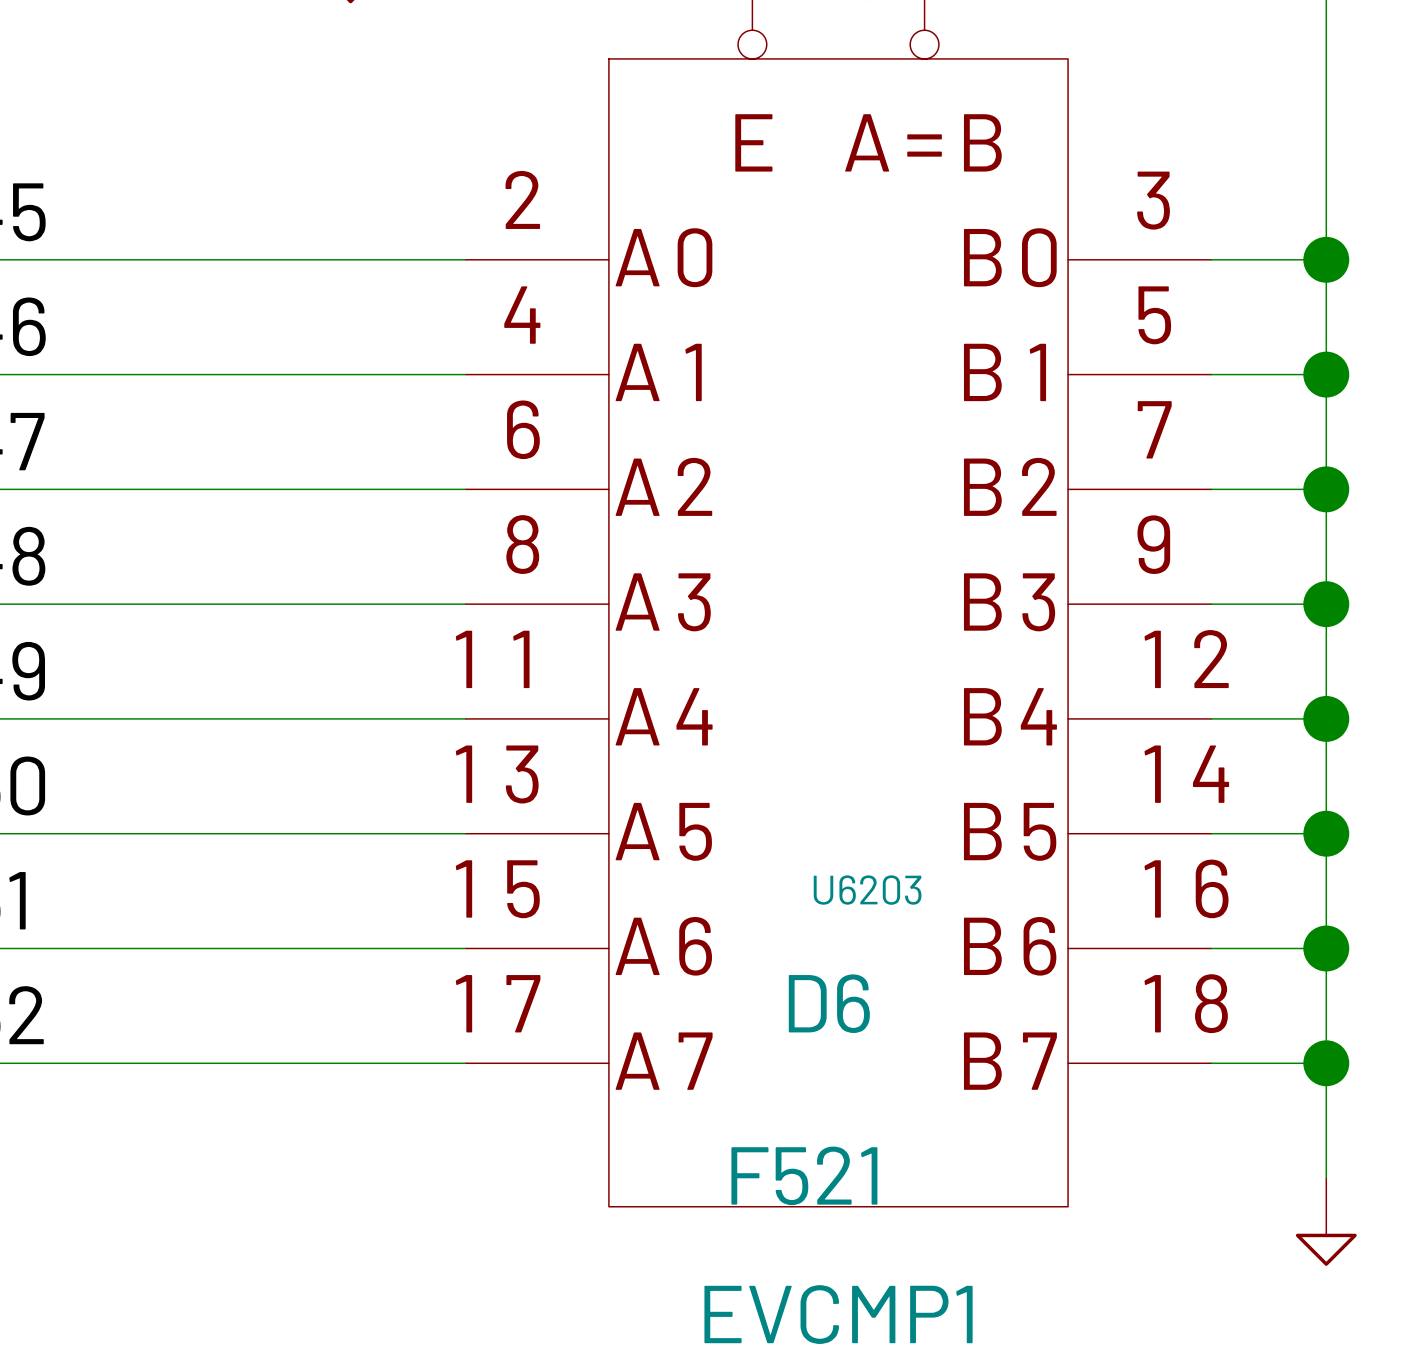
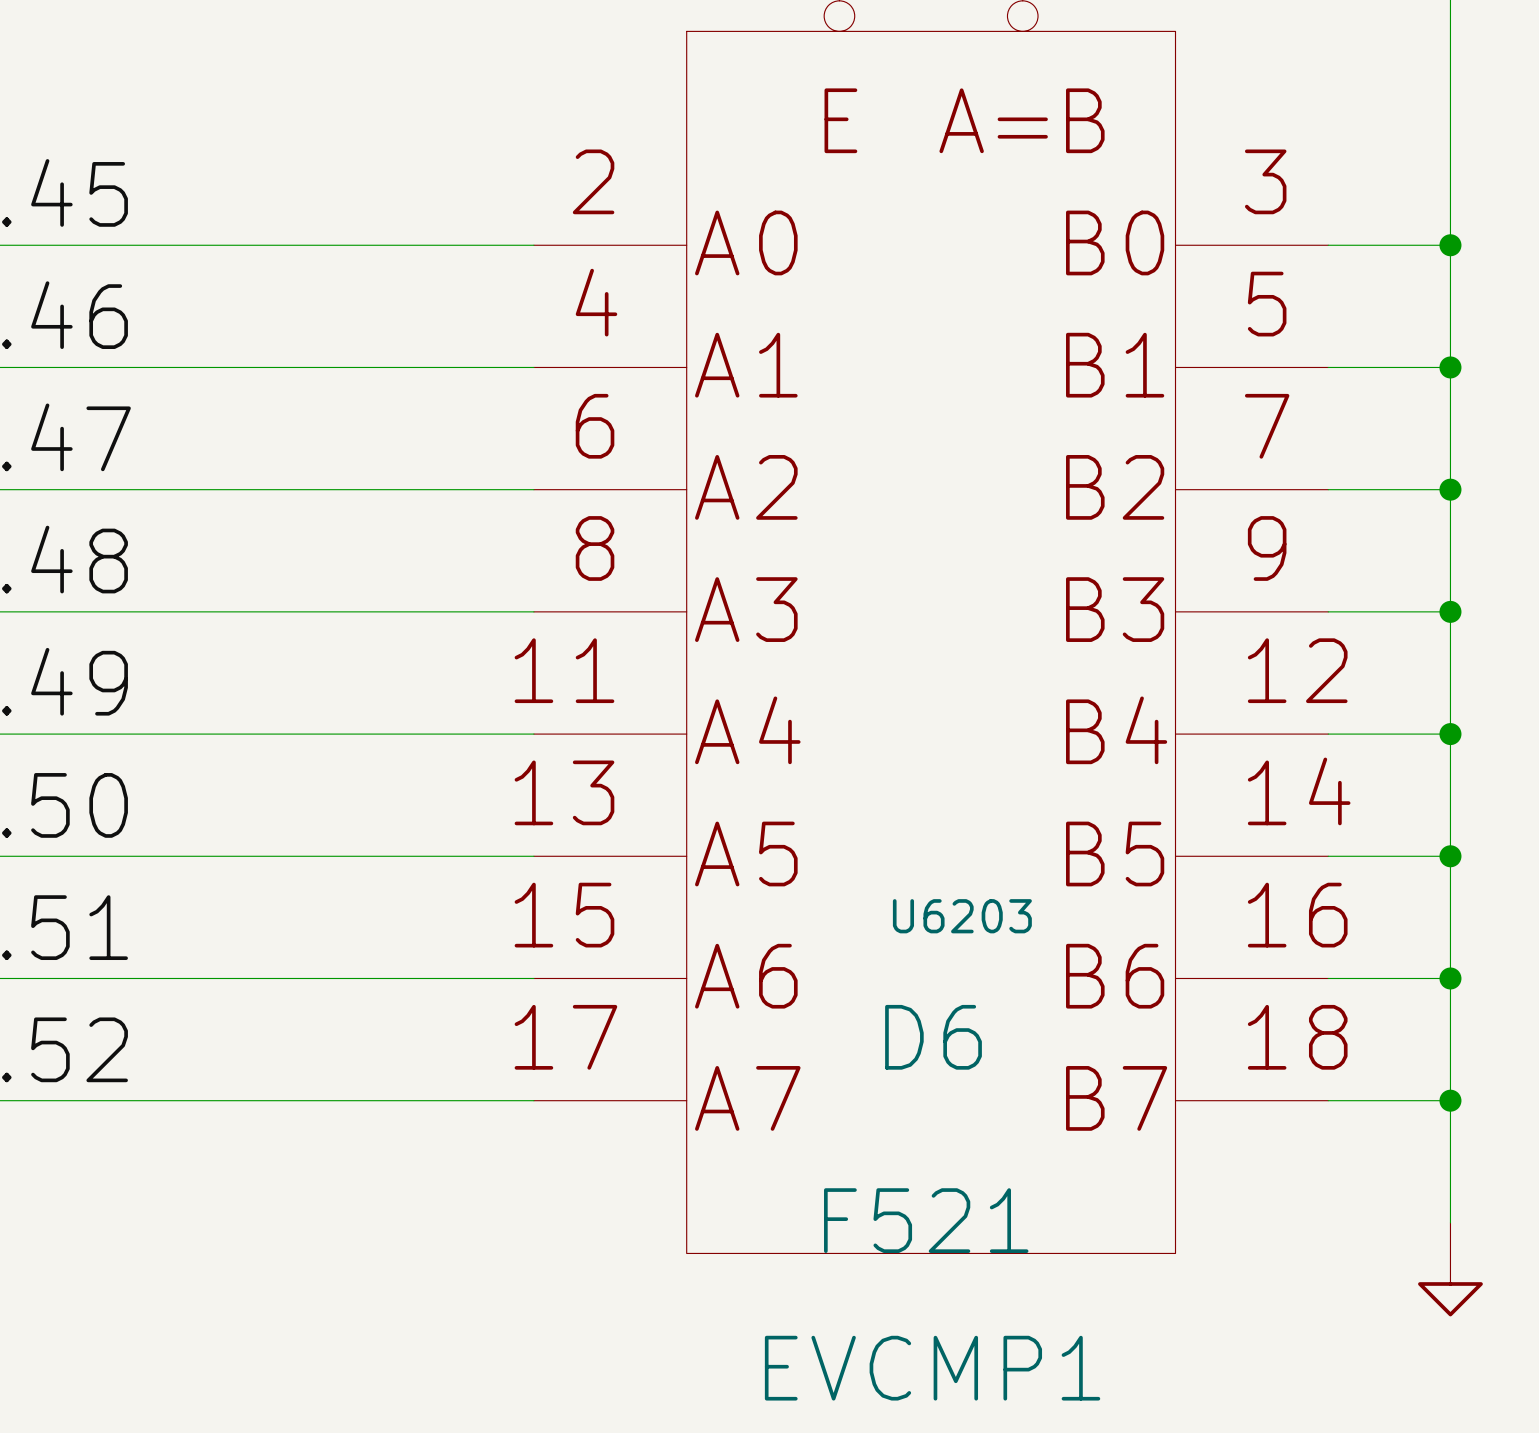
junction size: [1303, 236, 1350, 283] -> [1439, 234, 1462, 257]
junction size: [1303, 351, 1350, 398] -> [1439, 356, 1462, 379]
junction size: [1303, 466, 1350, 513] -> [1439, 478, 1462, 501]
junction size: [1303, 581, 1350, 628] -> [1439, 600, 1462, 623]
junction size: [1303, 695, 1350, 742] -> [1439, 723, 1462, 746]
junction size: [1303, 810, 1350, 857] -> [1439, 845, 1462, 868]
junction size: [1303, 925, 1350, 972] -> [1439, 967, 1462, 990]
junction size: [1303, 1040, 1350, 1087] -> [1439, 1089, 1462, 1112]

